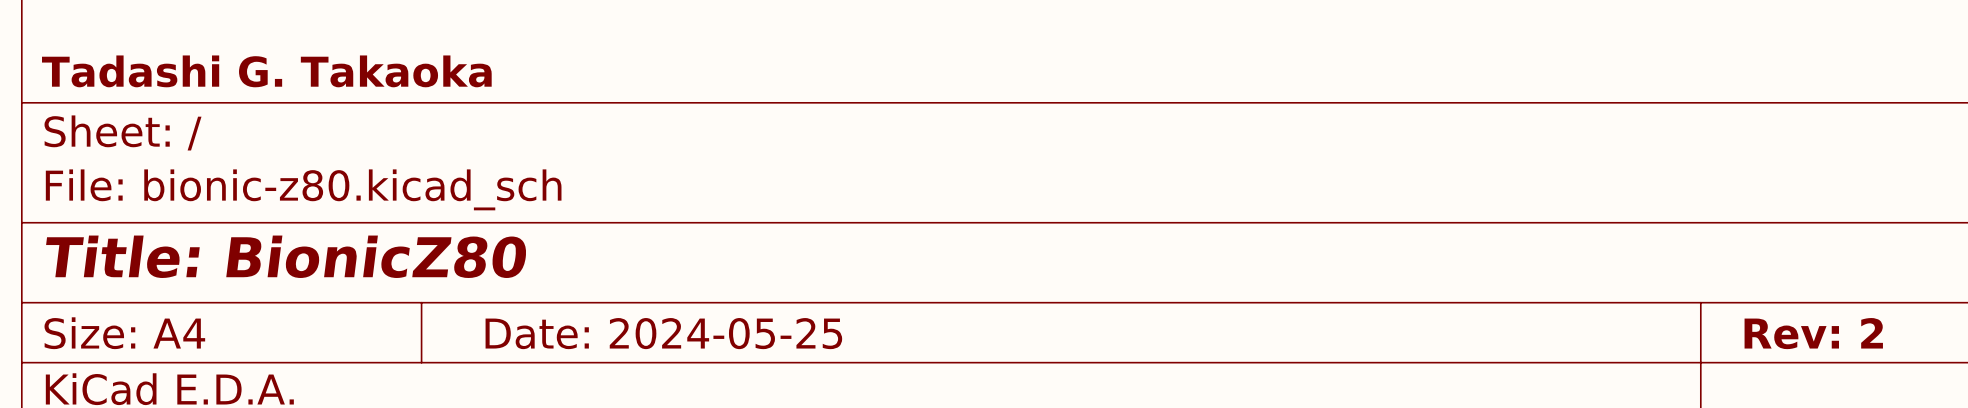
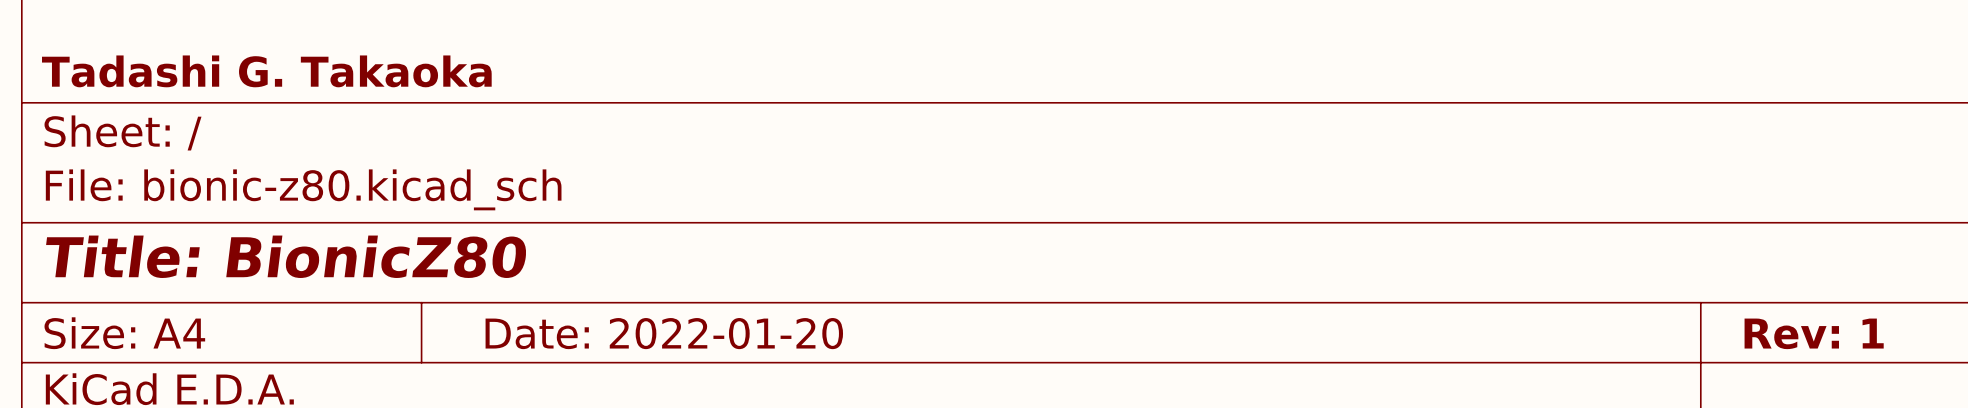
title block: Date: 2024-05-25 (663, 333) -> Date: 2022-01-20 (664, 333)
title block: Rev: 2 (1813, 333) -> Rev: 1 (1814, 333)

